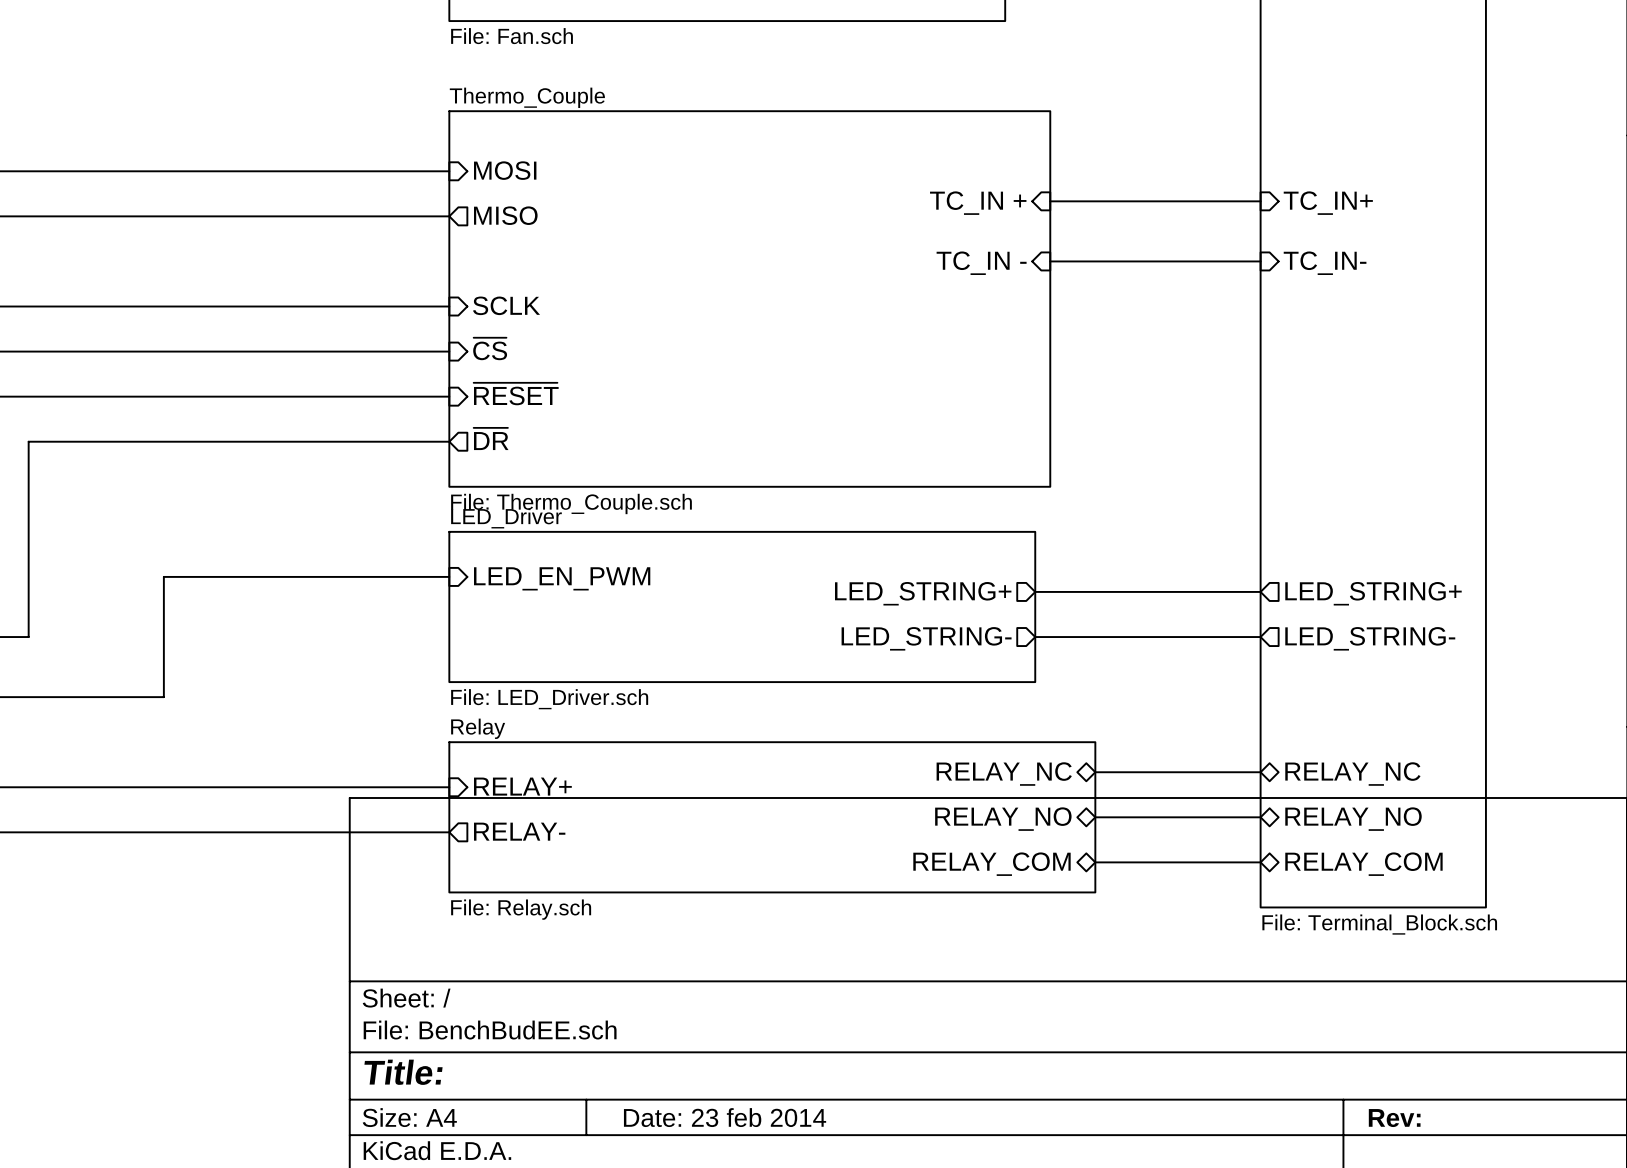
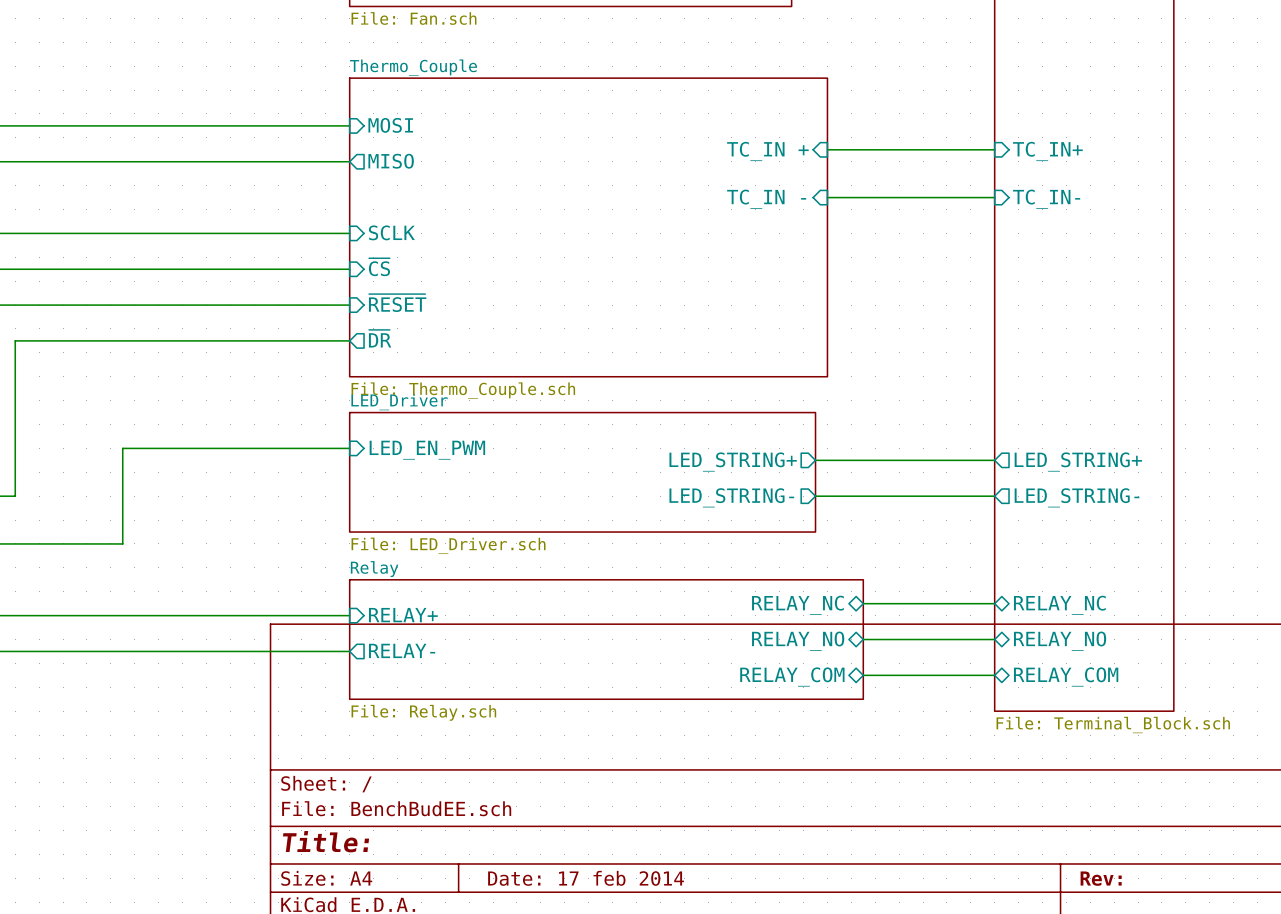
title block: Date: 23 feb 2014 (725, 1117) -> Date: 17 feb 2014 (586, 878)

